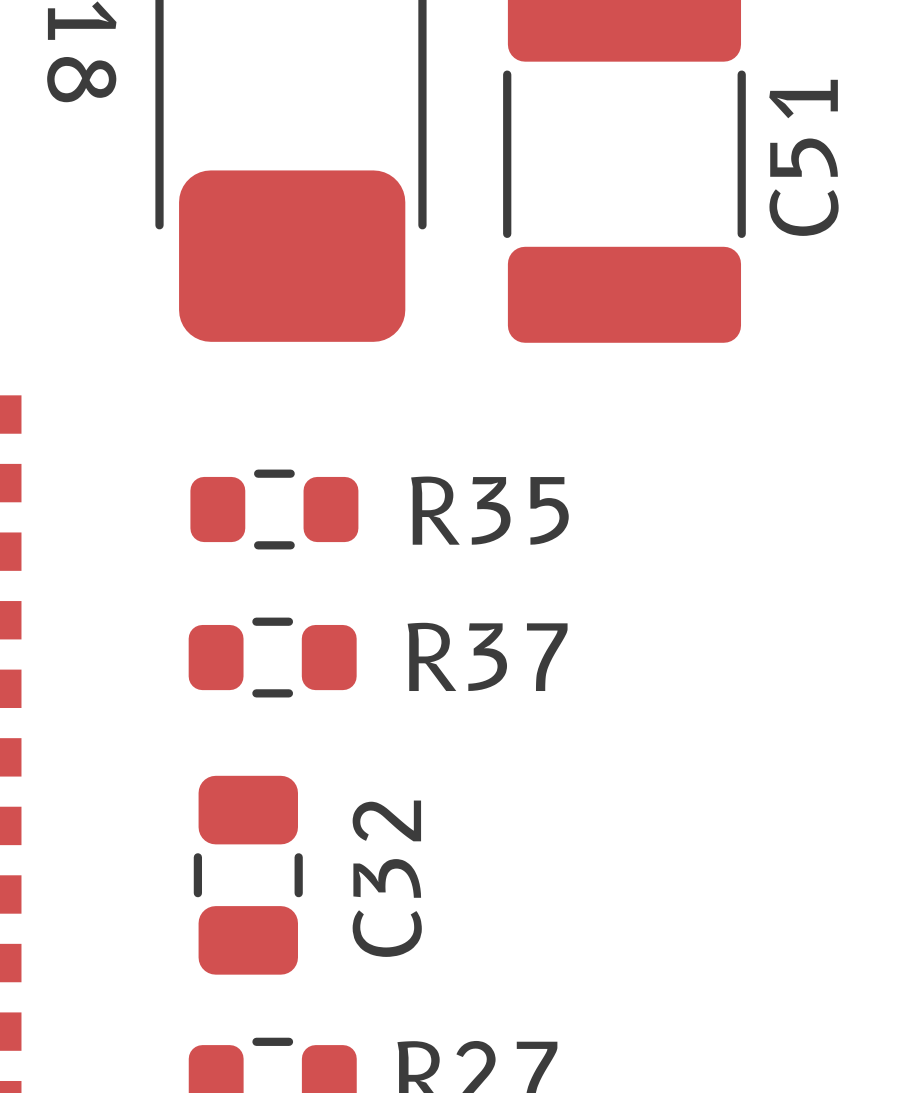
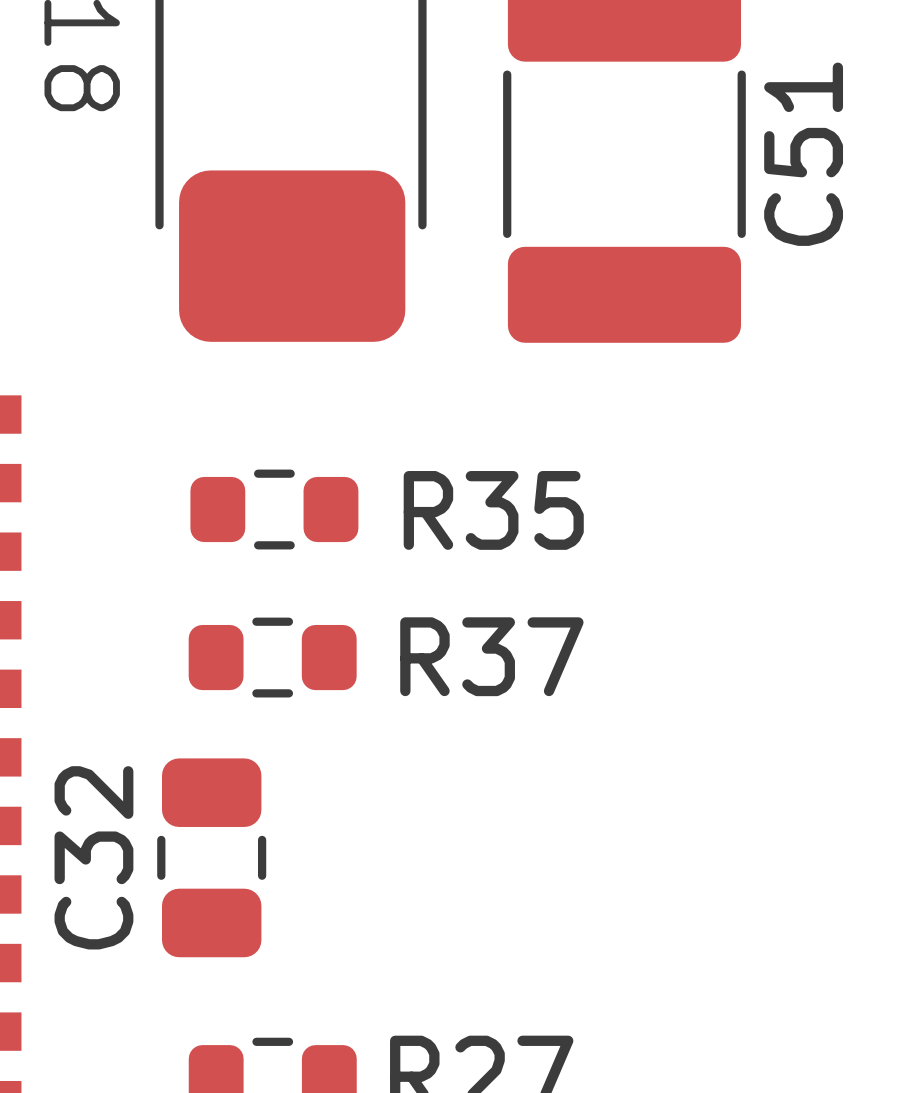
C32 position: (248, 875) -> (211, 857)
C32 name position: C32 (387, 878) -> C32 (93, 857)

